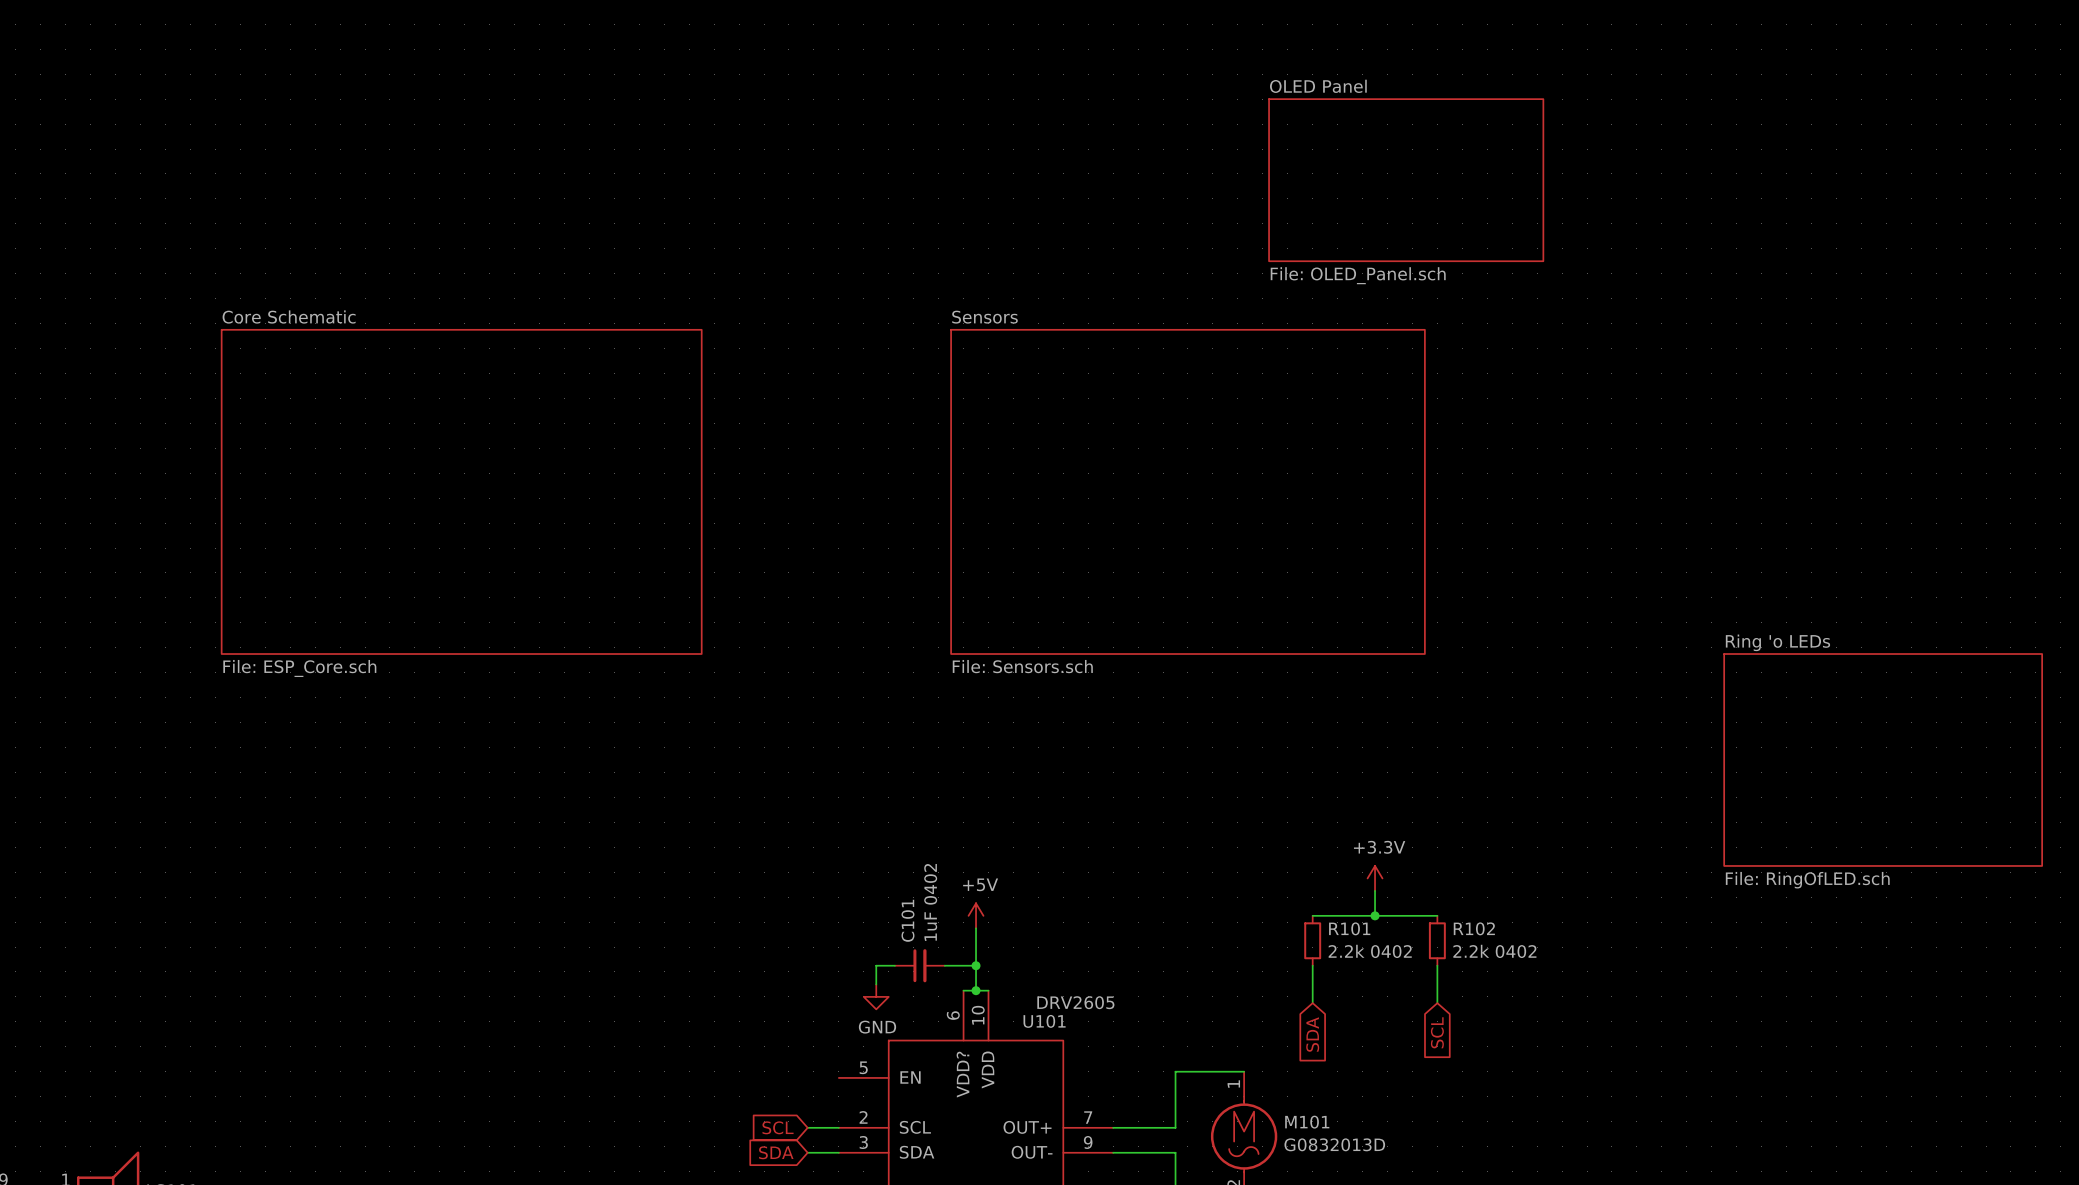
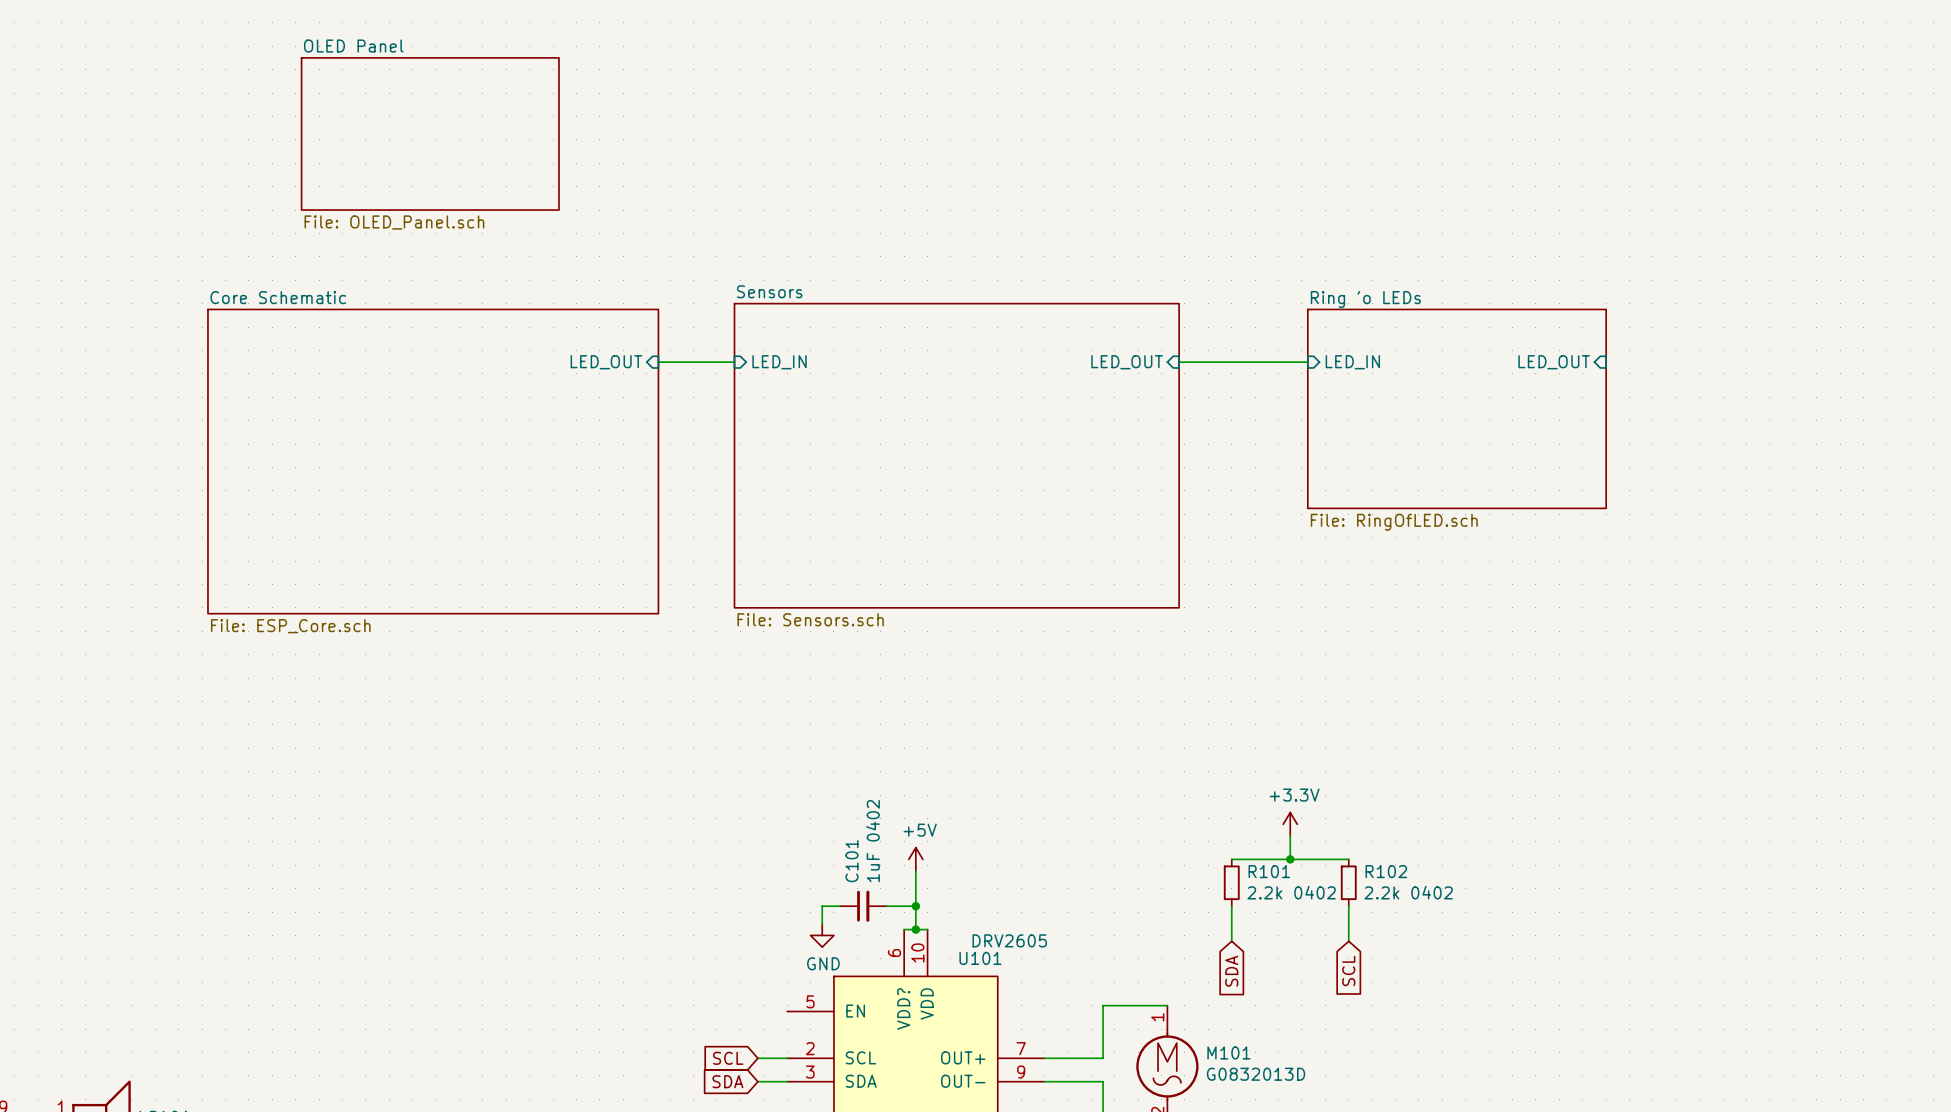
sheet OLED Panel: none -> File: OLED_Panel.sch (430, 133)
sheet OLED Panel: File: OLED_Panel.sch (1406, 180) -> none
wire: none -> (658, 362) (734, 362)
wire: none -> (1179, 362) (1307, 362)
sheet pin: none -> LED_OUT (606, 362)
sheet pin: none -> LED_IN (779, 362)
sheet pin: none -> LED_OUT (1127, 362)
sheet pin: none -> LED_IN (1352, 362)
sheet pin: none -> LED_OUT (1554, 362)
sheet Ring 'o LEDs: none -> File: RingOfLED.sch (1456, 408)
sheet Sensors position: (1187, 491) -> (956, 455)
sheet Ring 'o LEDs: File: RingOfLED.sch (1883, 759) -> none

